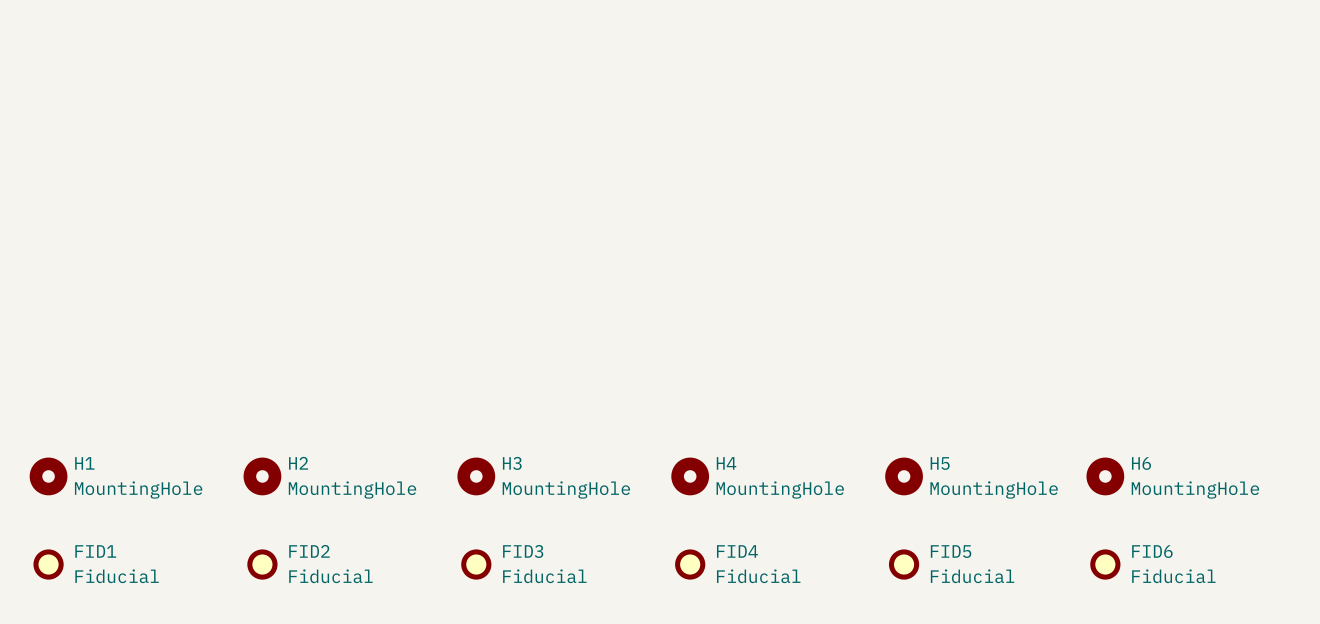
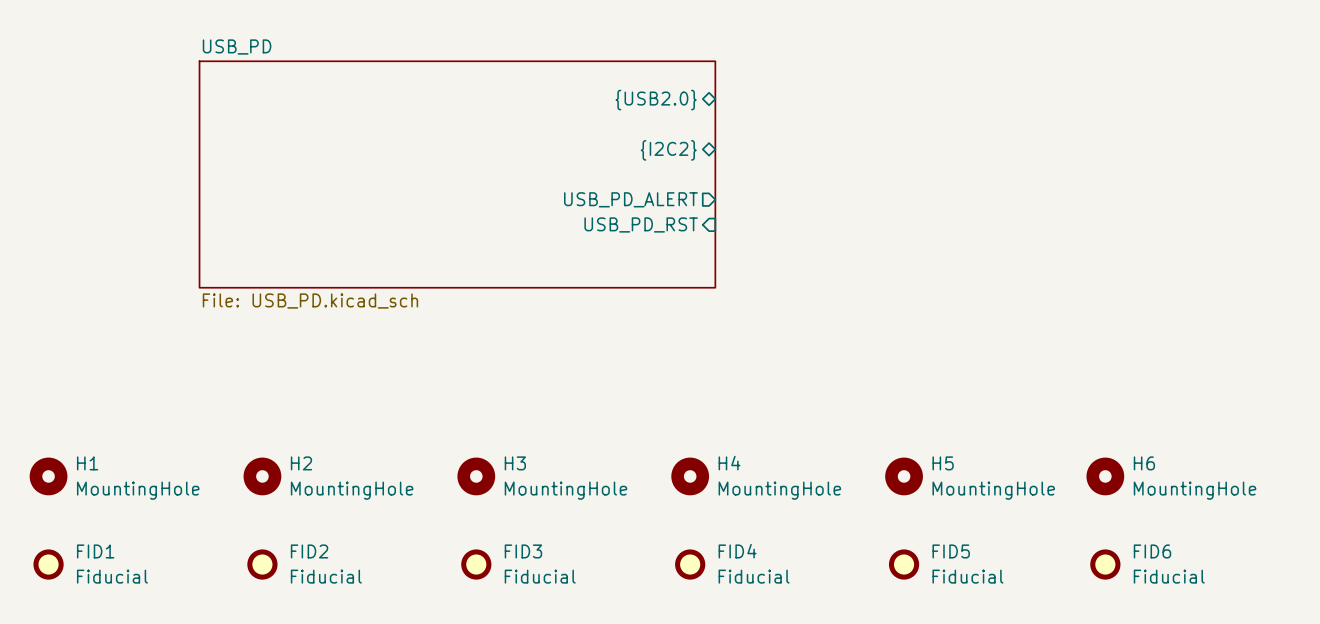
sheet pin: none -> {USB2.0} (656, 100)
sheet pin: none -> {I2C2} (668, 150)
sheet USB_PD: none -> File: USB_PD.kicad_sch (457, 174)
sheet pin: none -> USB_PD_ALERT (630, 199)
sheet pin: none -> USB_PD_RST (641, 224)

